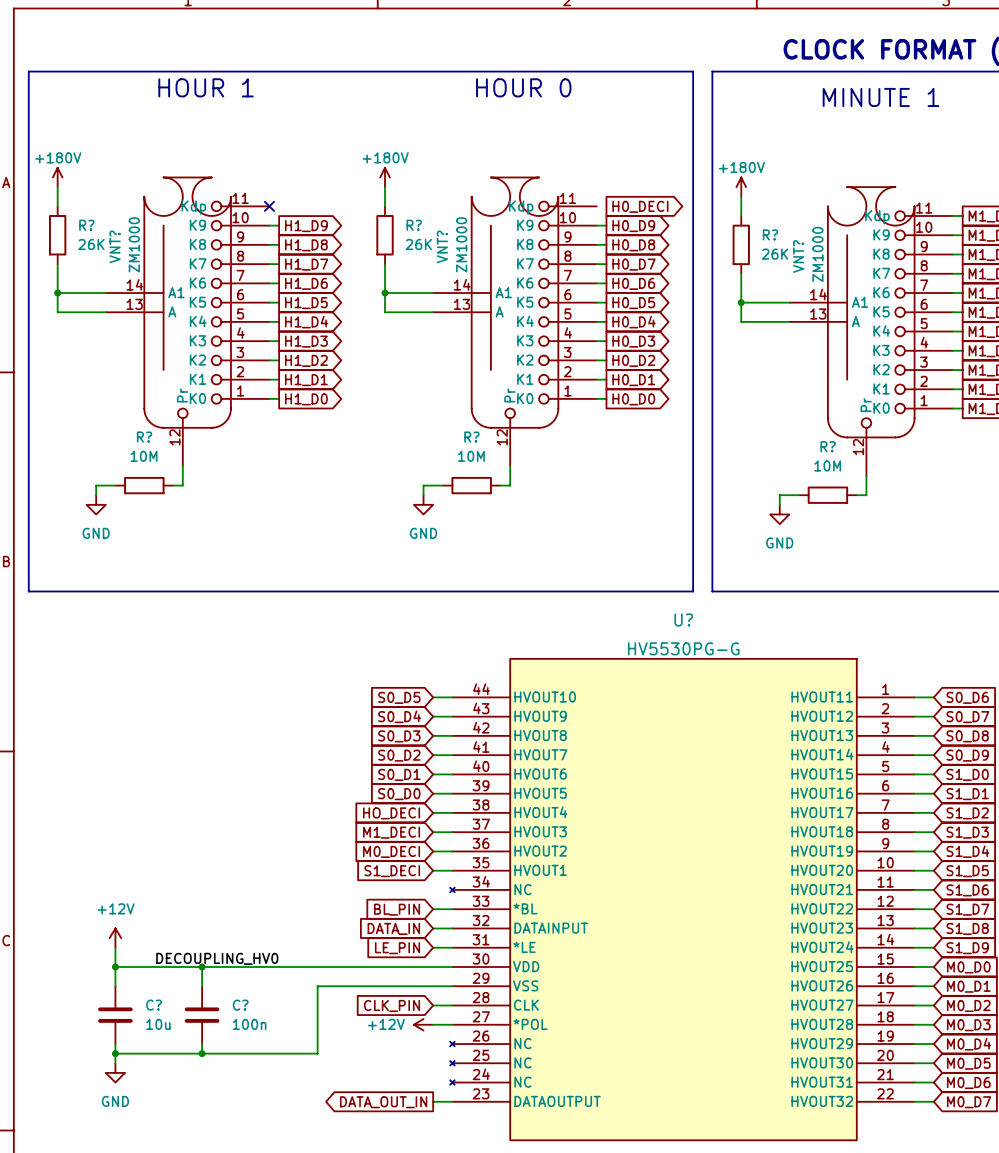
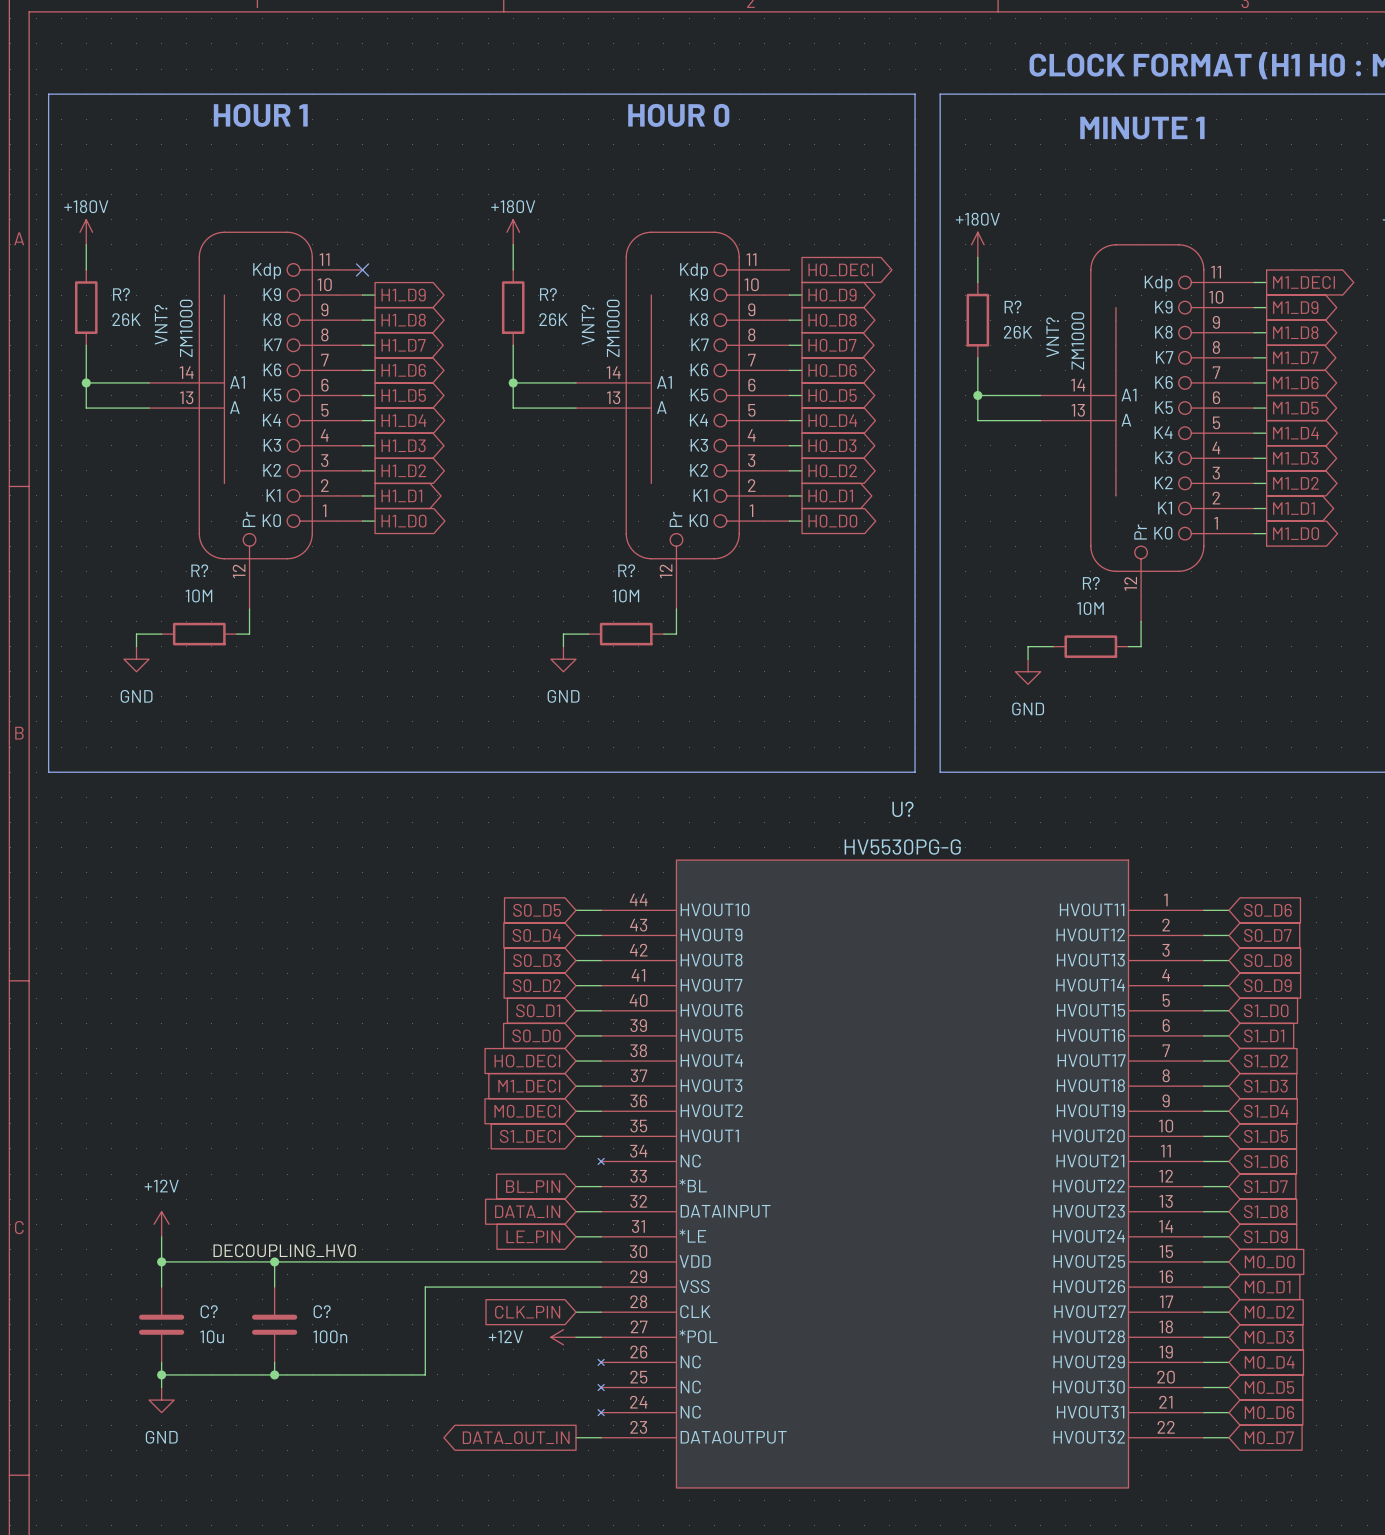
VNT? symbol: [105, 177, 270, 467] -> [149, 232, 363, 609]
VNT? symbol: [433, 177, 597, 467] -> [576, 232, 790, 609]
VNT? symbol: [789, 187, 954, 476] -> [1040, 244, 1255, 622]

